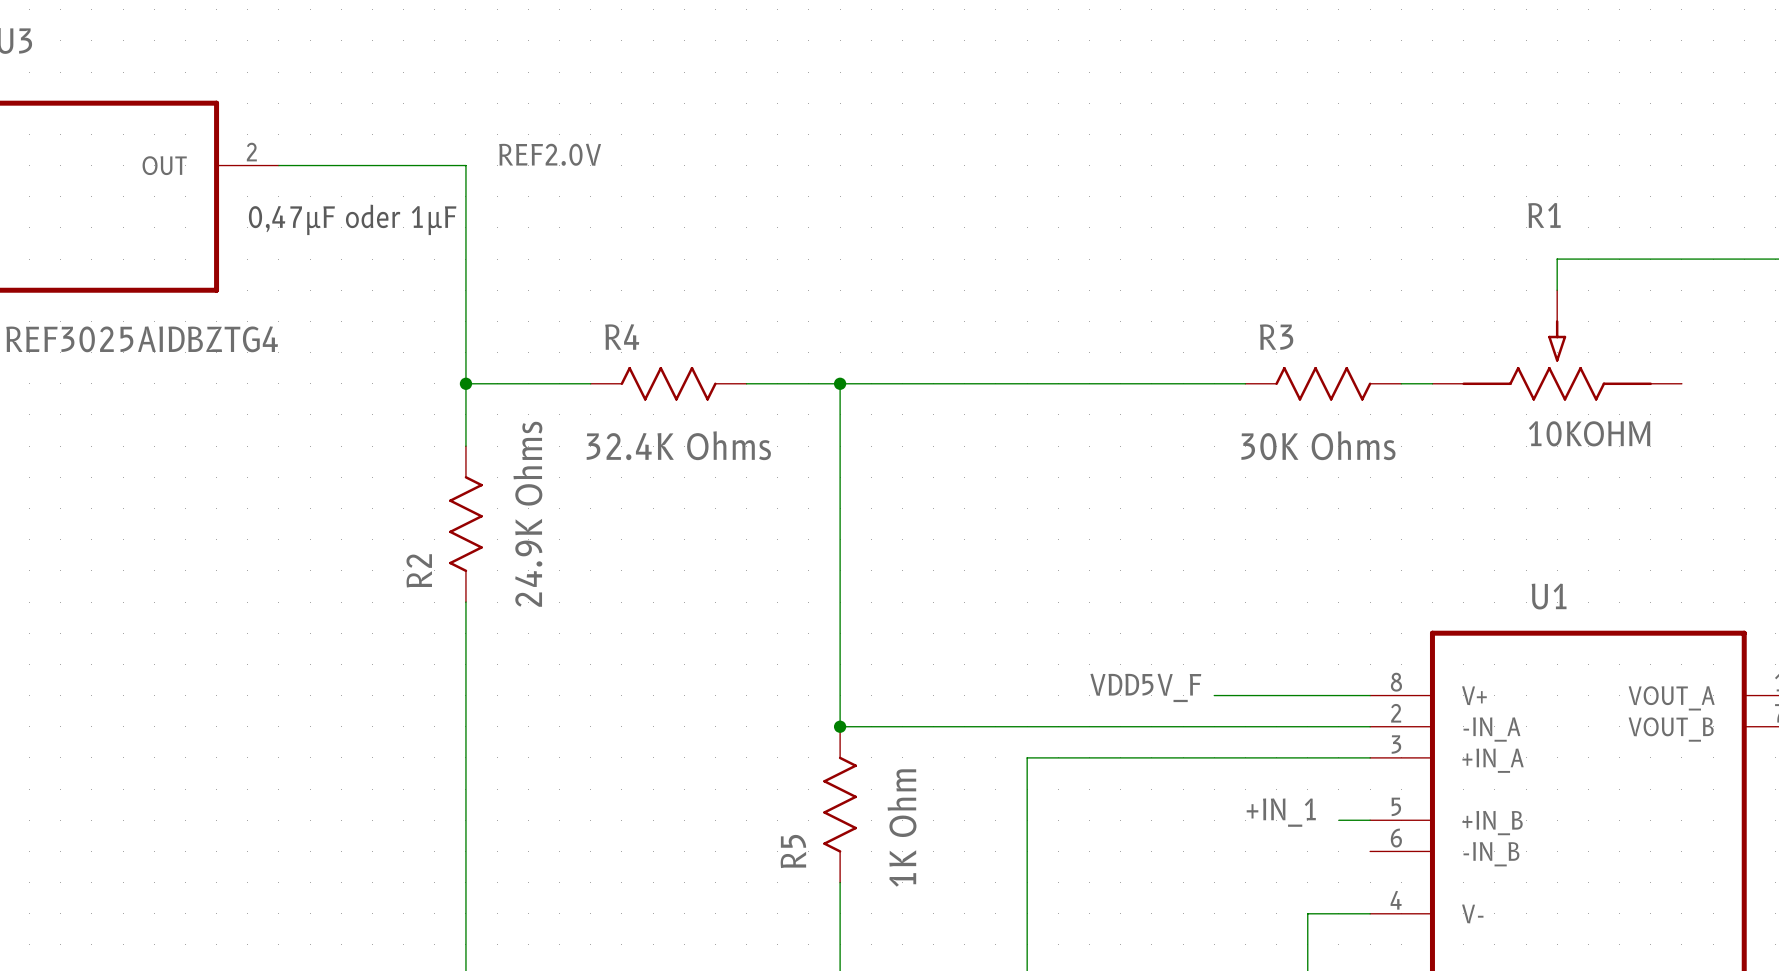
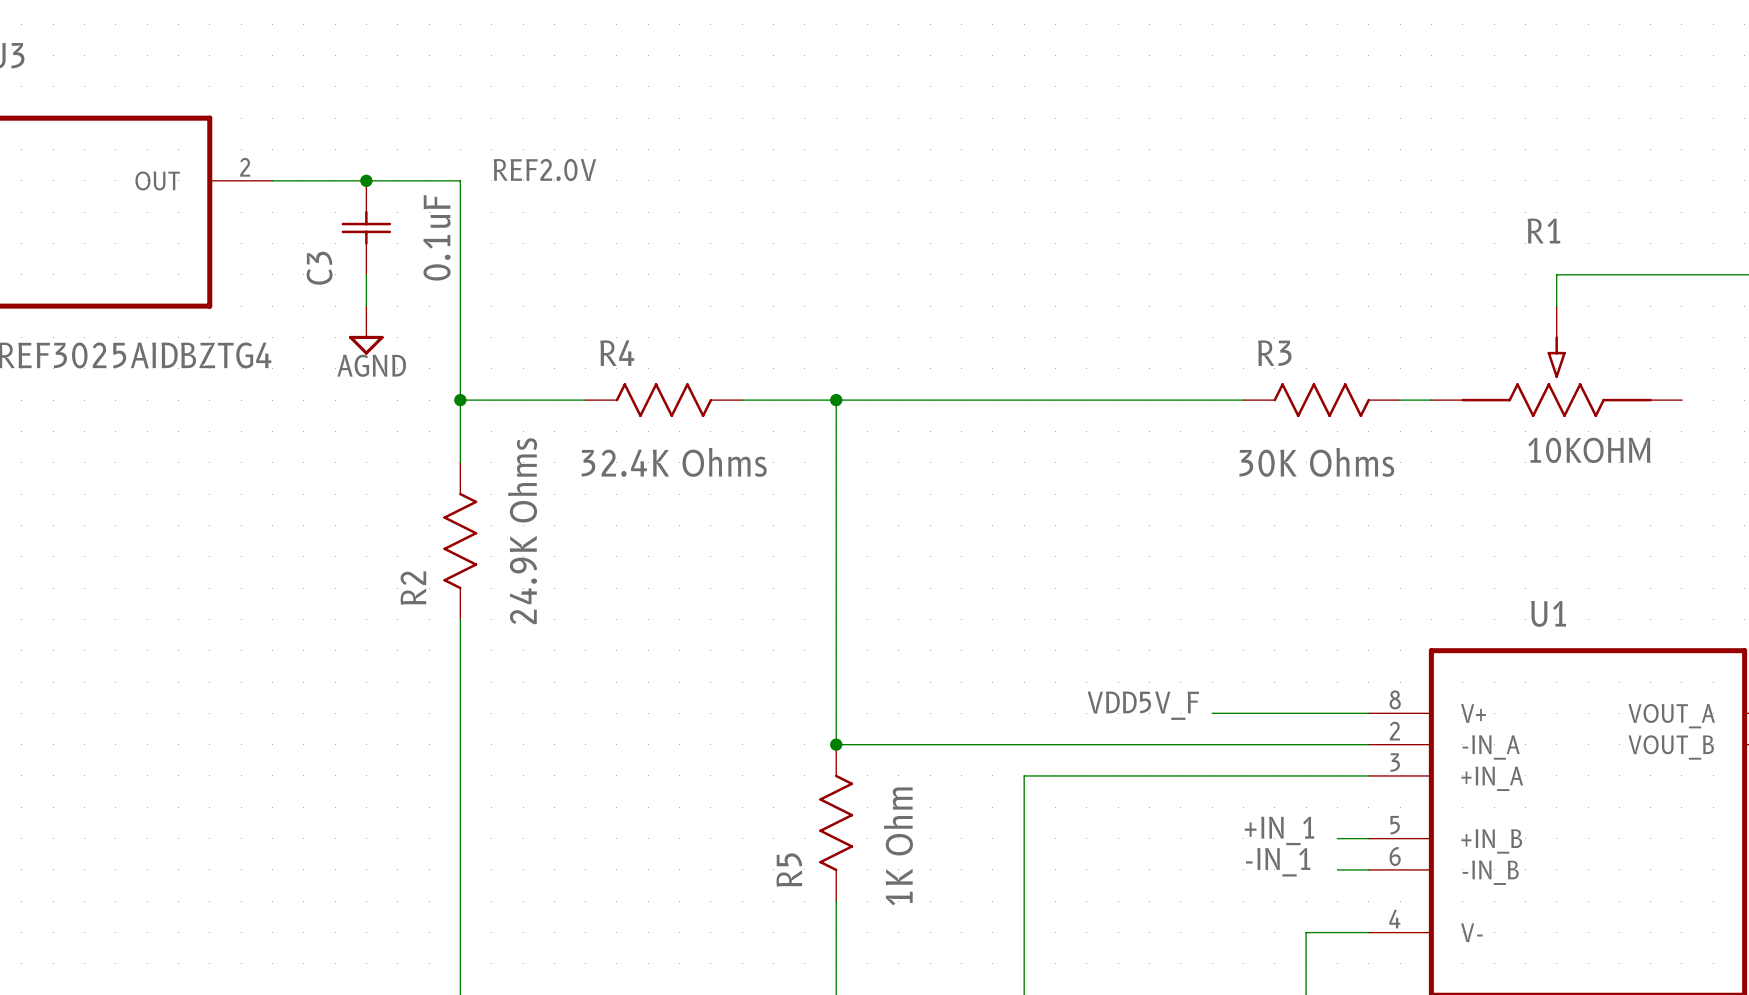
junction: none -> (366, 180)
C3: none -> 0.1uF (366, 227)
text: 0,47µF oder 1µF (352, 219) -> none
wire: none -> (366, 274) (366, 306)
power symbol: none -> AGND (366, 330)
label: none -> -IN_1 (1278, 862)
wire: none -> (1337, 869) (1368, 869)

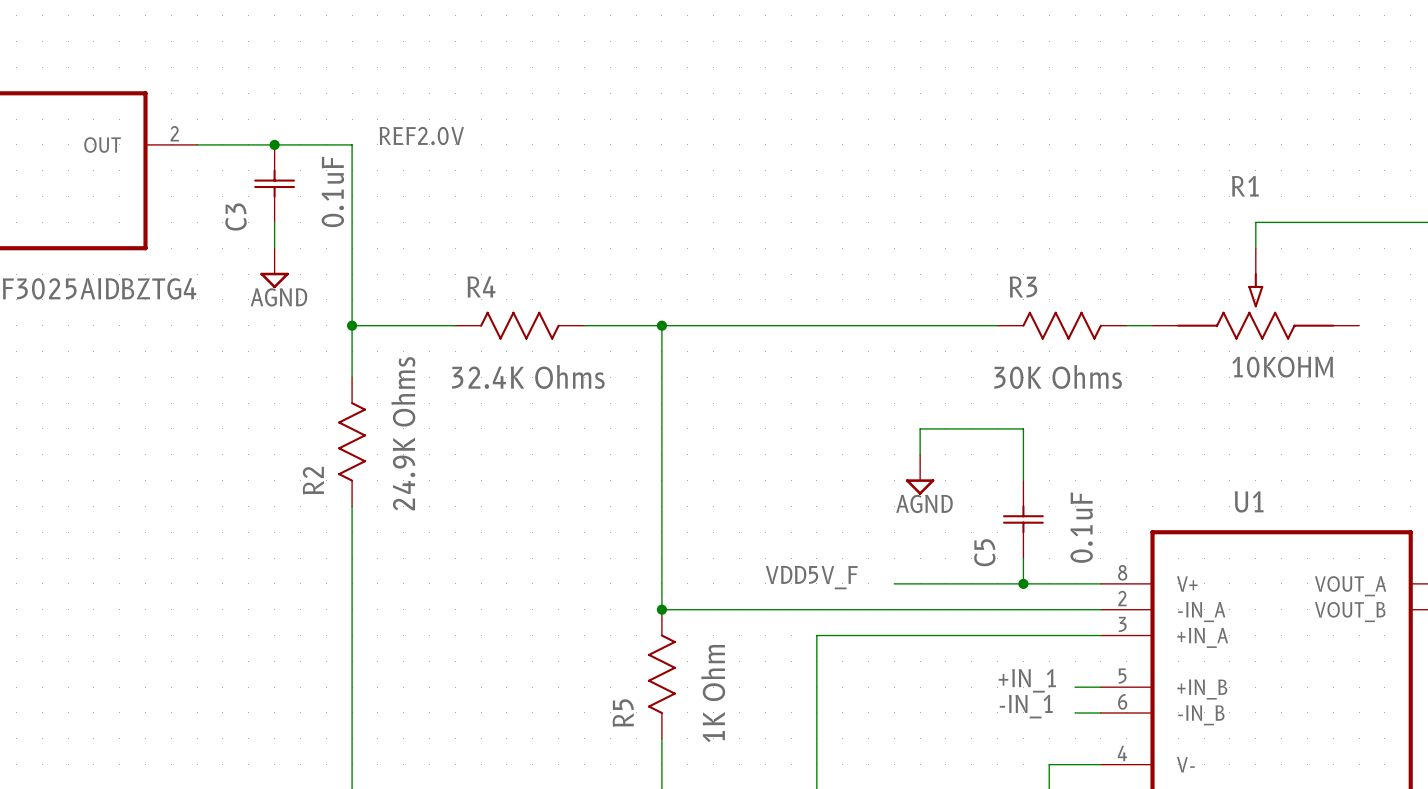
wire: none -> (920, 454) (920, 428) (1023, 428) (1023, 480)
power symbol: none -> AGND (920, 474)
C5: none -> 0.1uF (1023, 519)
wire: none -> (1023, 558) (1023, 583)
label position: VDD5V_F (1143, 705) -> VDD5V_F (811, 577)
wire: none -> (894, 583) (971, 583)
junction: none -> (1023, 583)

